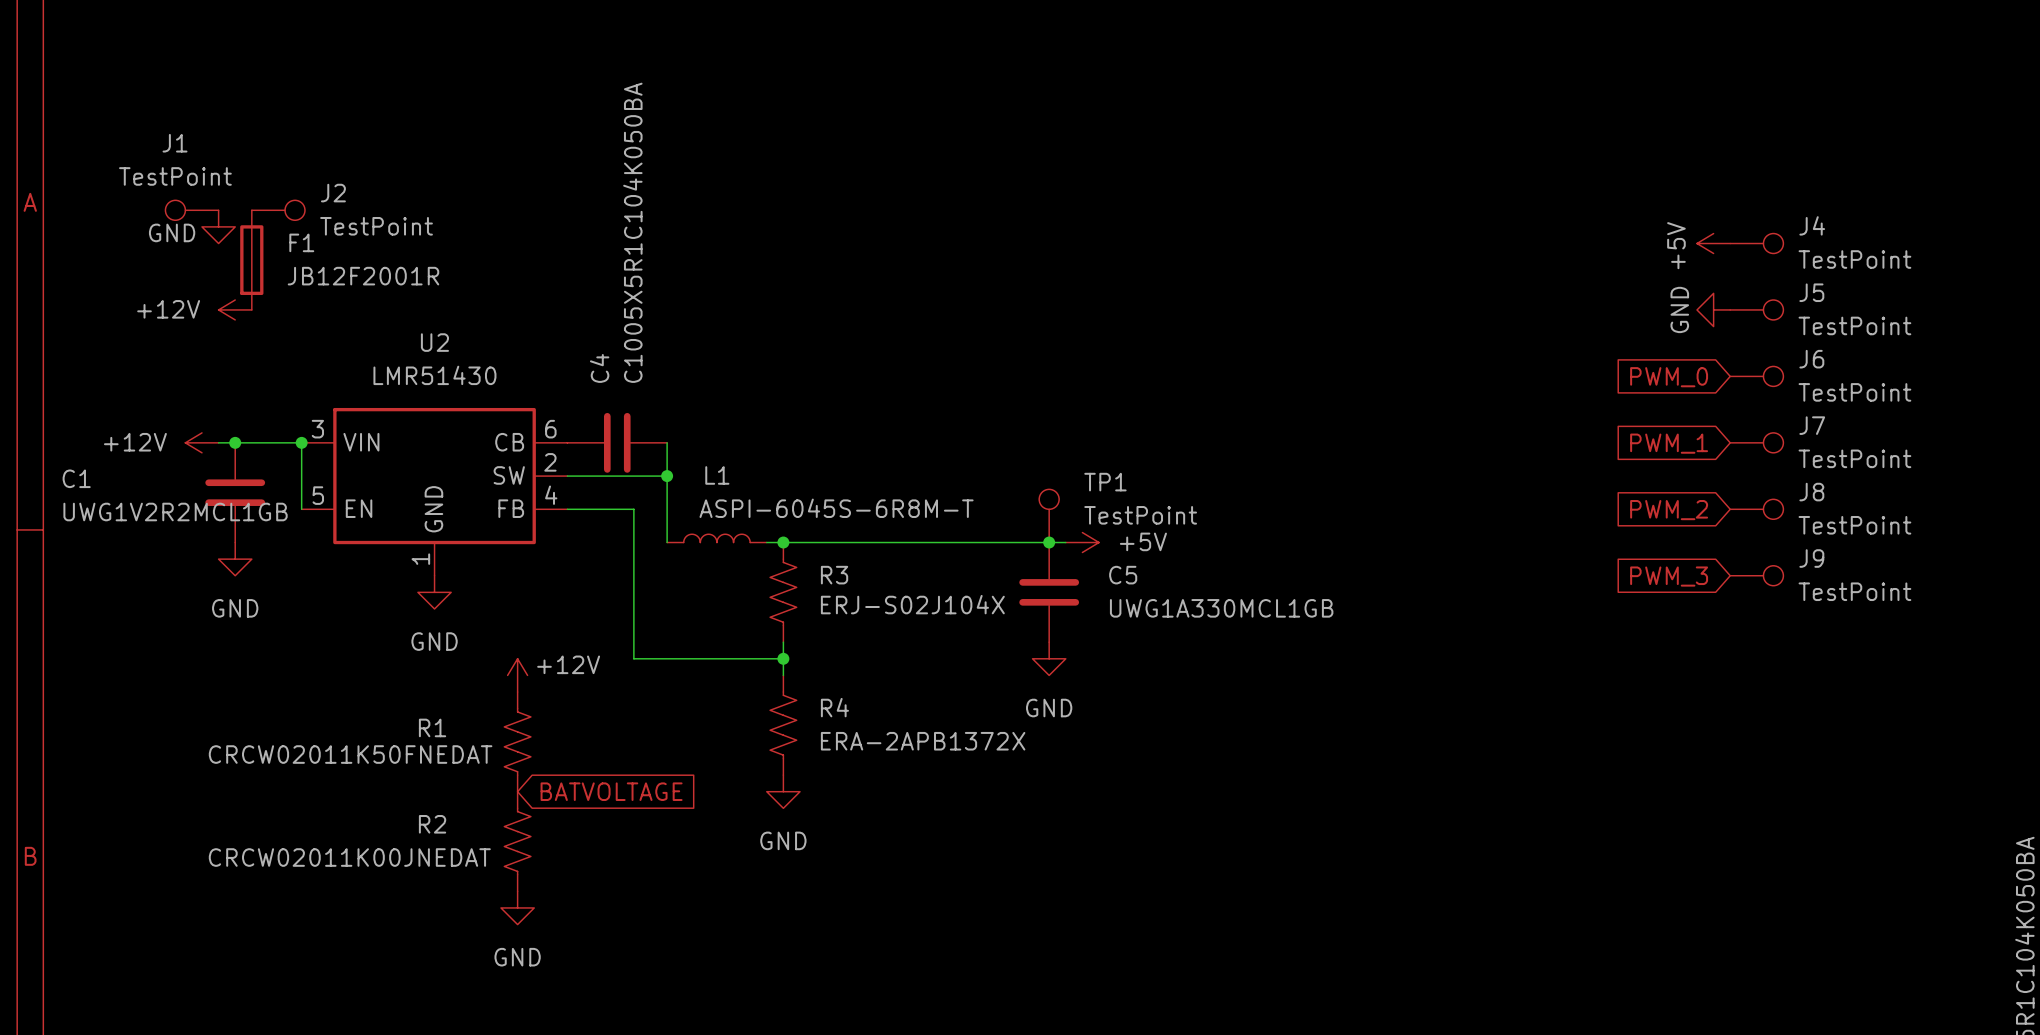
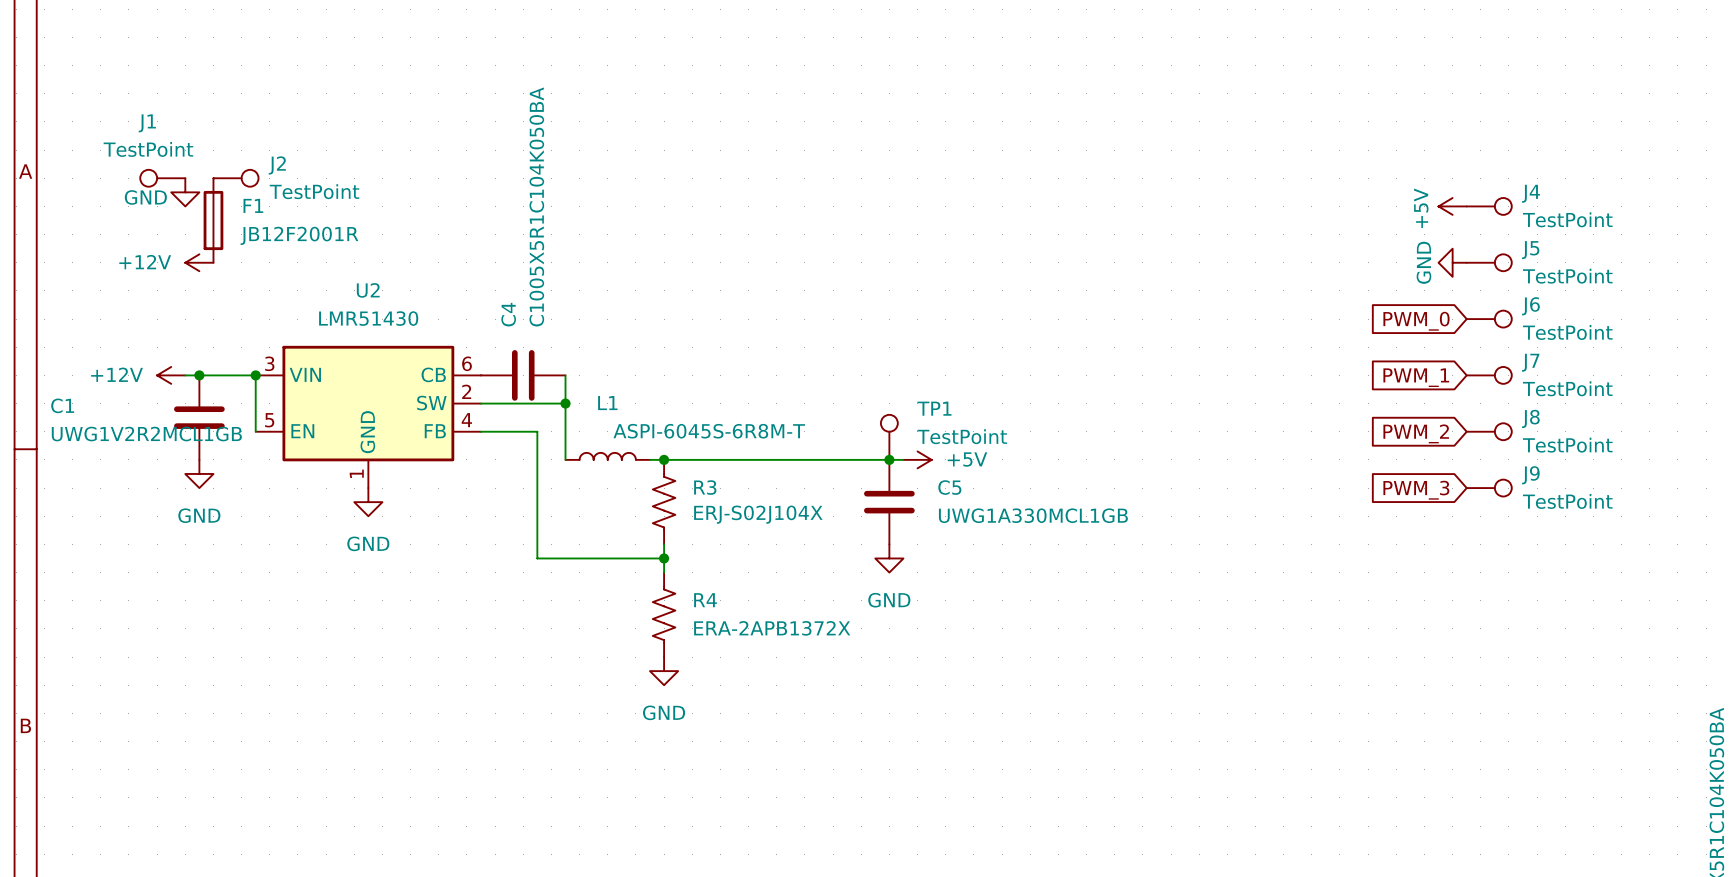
power symbol: +12V (517, 675) -> none
R1: CRCW02011K50FNEDAT (517, 741) -> none
global label: BATVOLTAGE (611, 791) -> none
R2: CRCW02011K00JNEDAT (517, 841) -> none
power symbol: GND (517, 907) -> none

